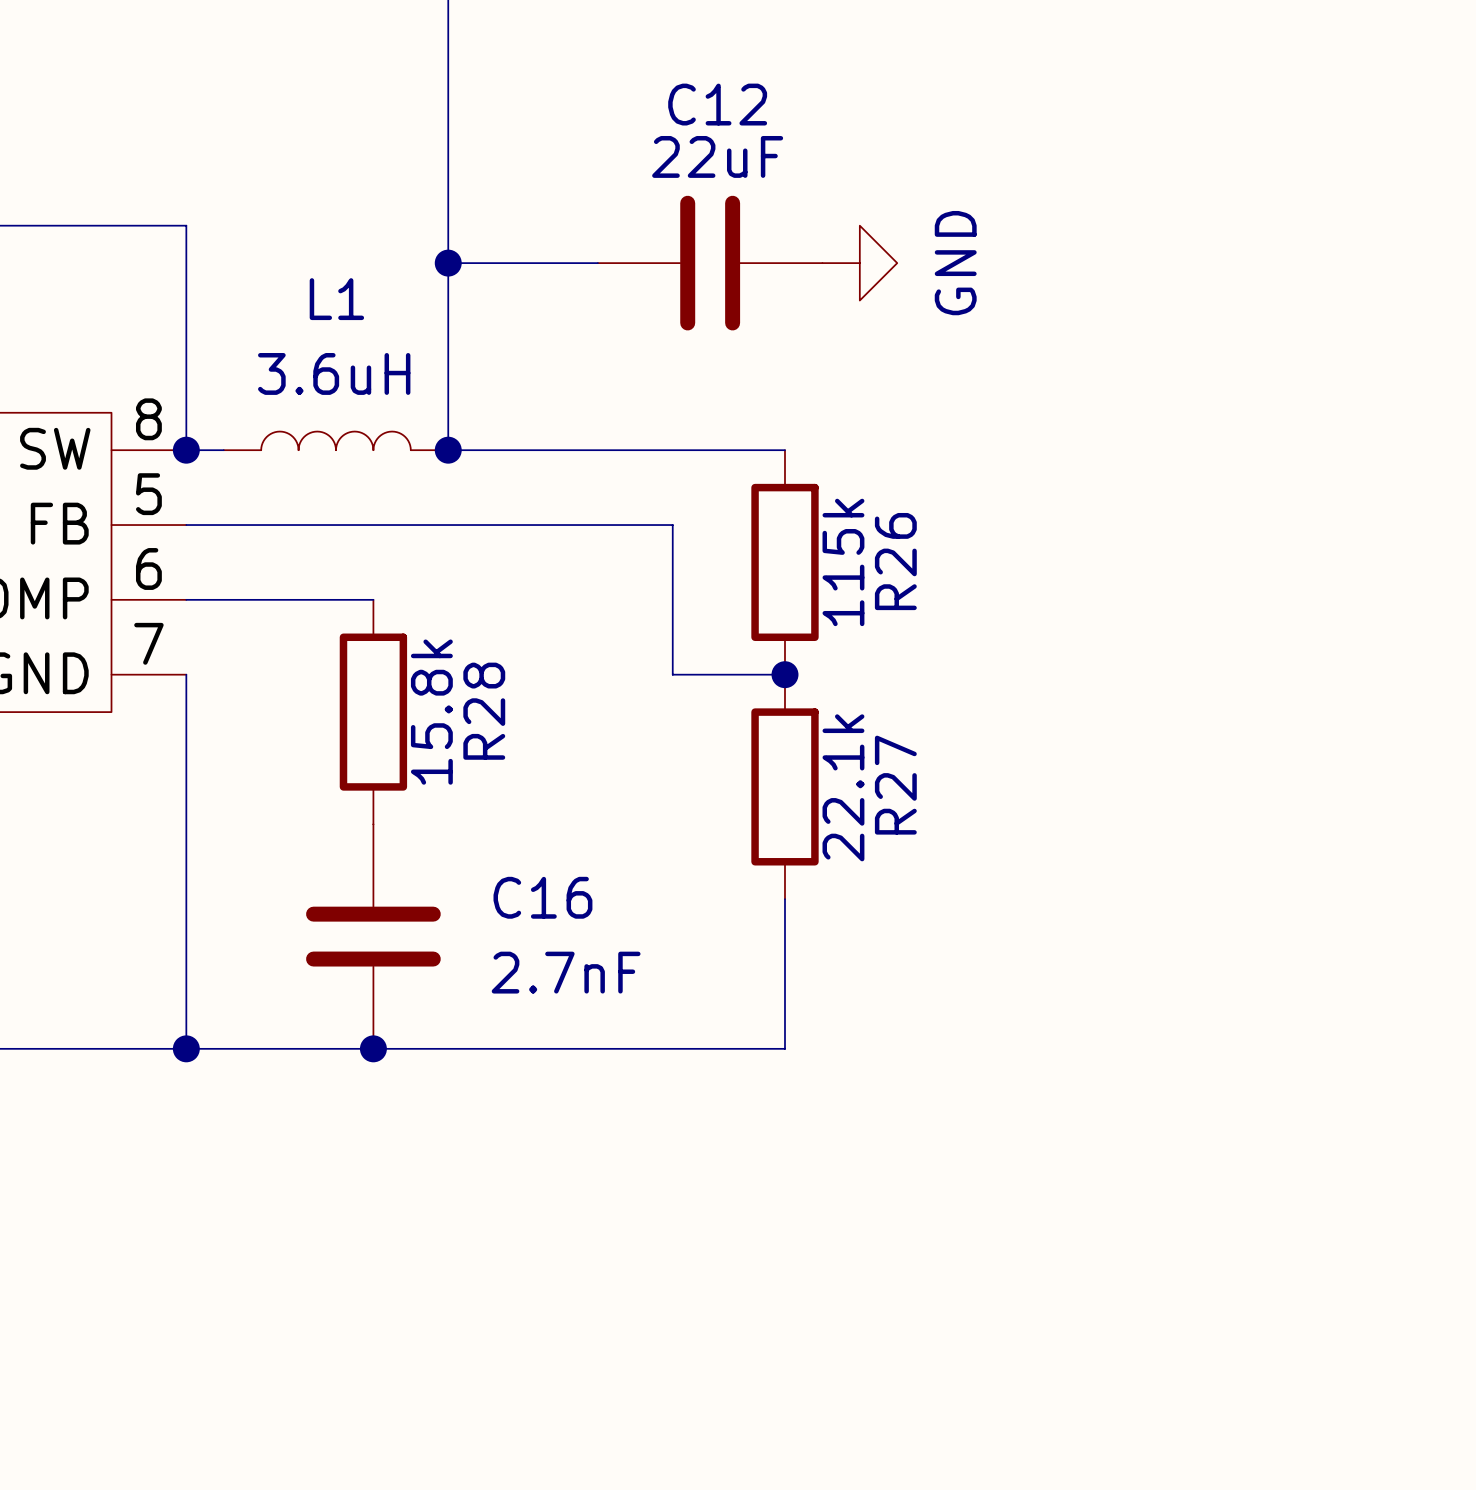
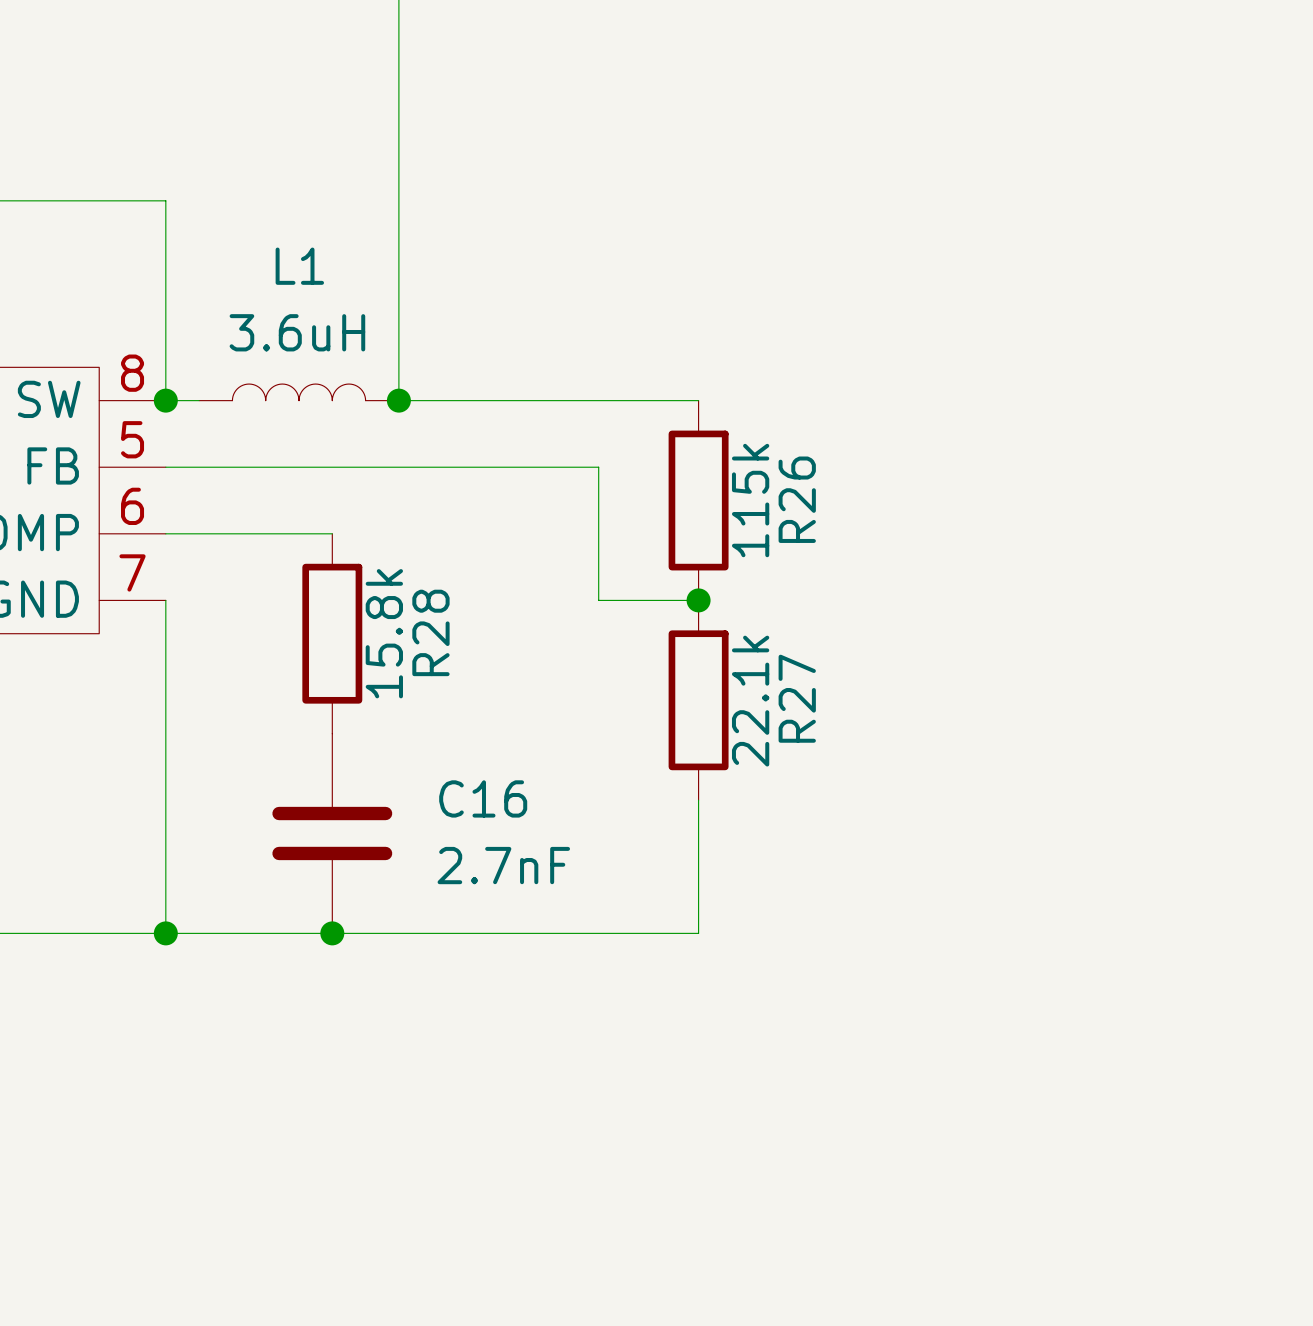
wire: (448, 263) (597, 263) -> none
junction: (448, 263) -> none
C12: 22uF (710, 263) -> none
power symbol: GND (859, 263) -> none

